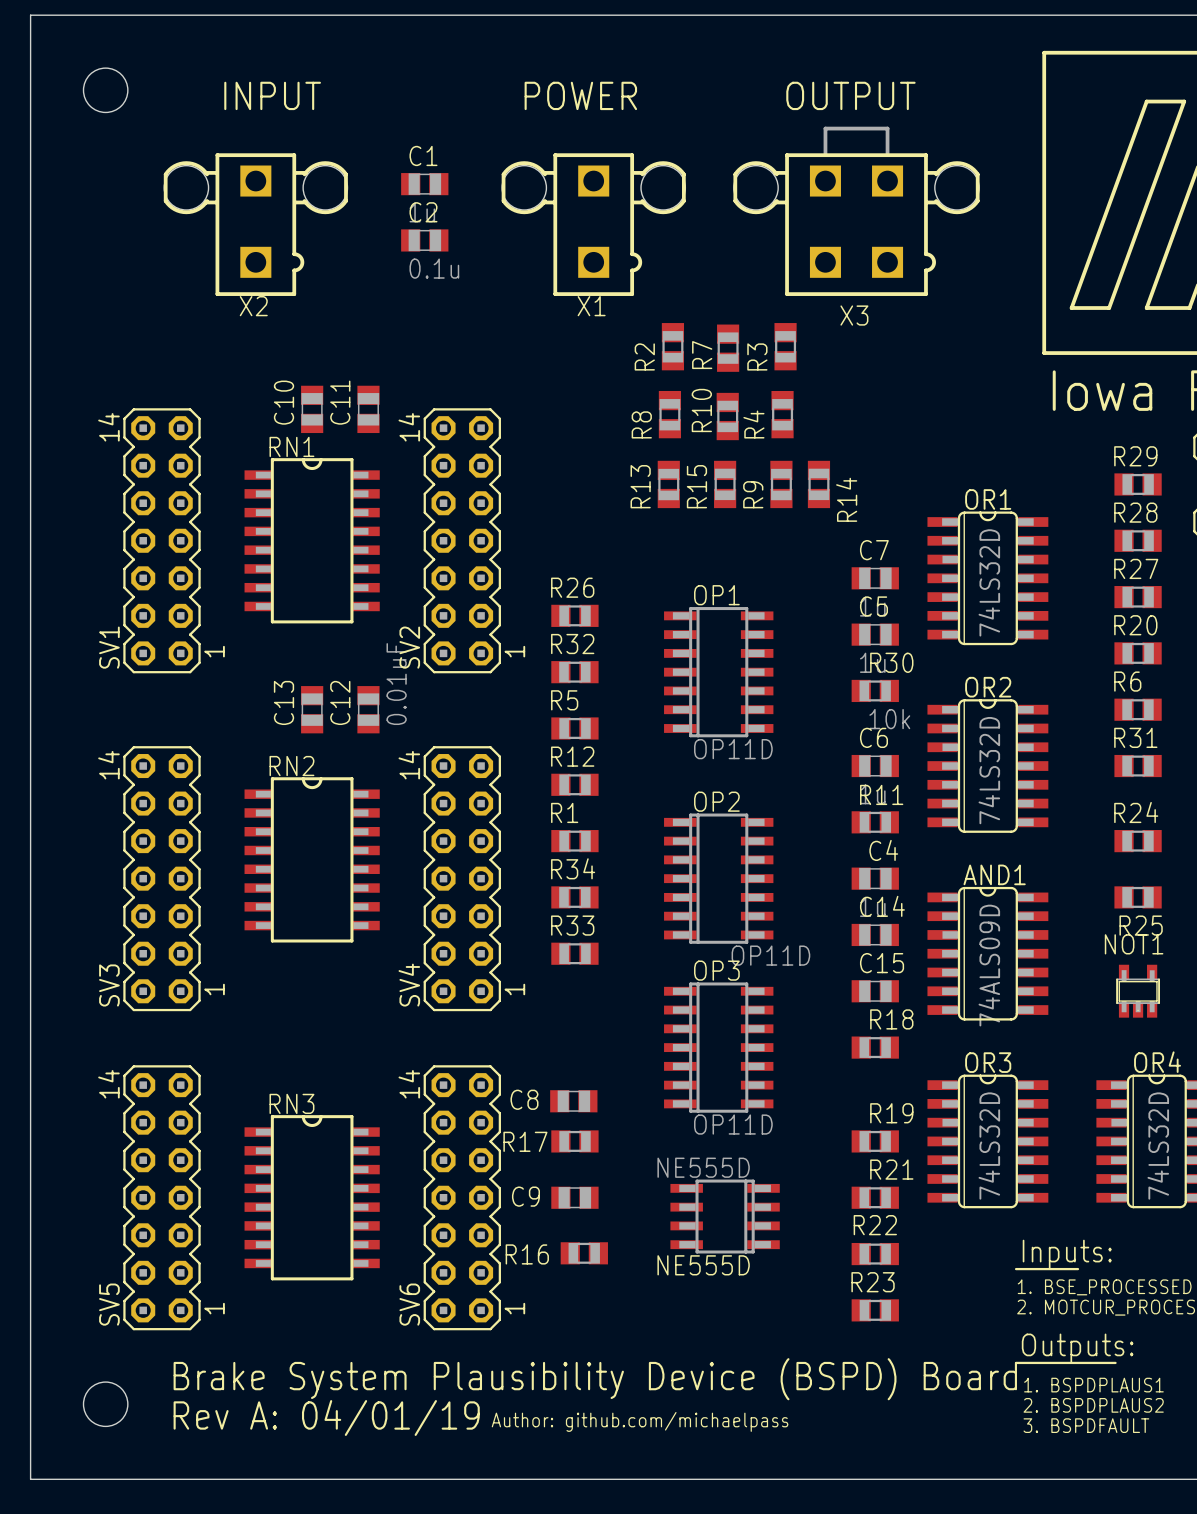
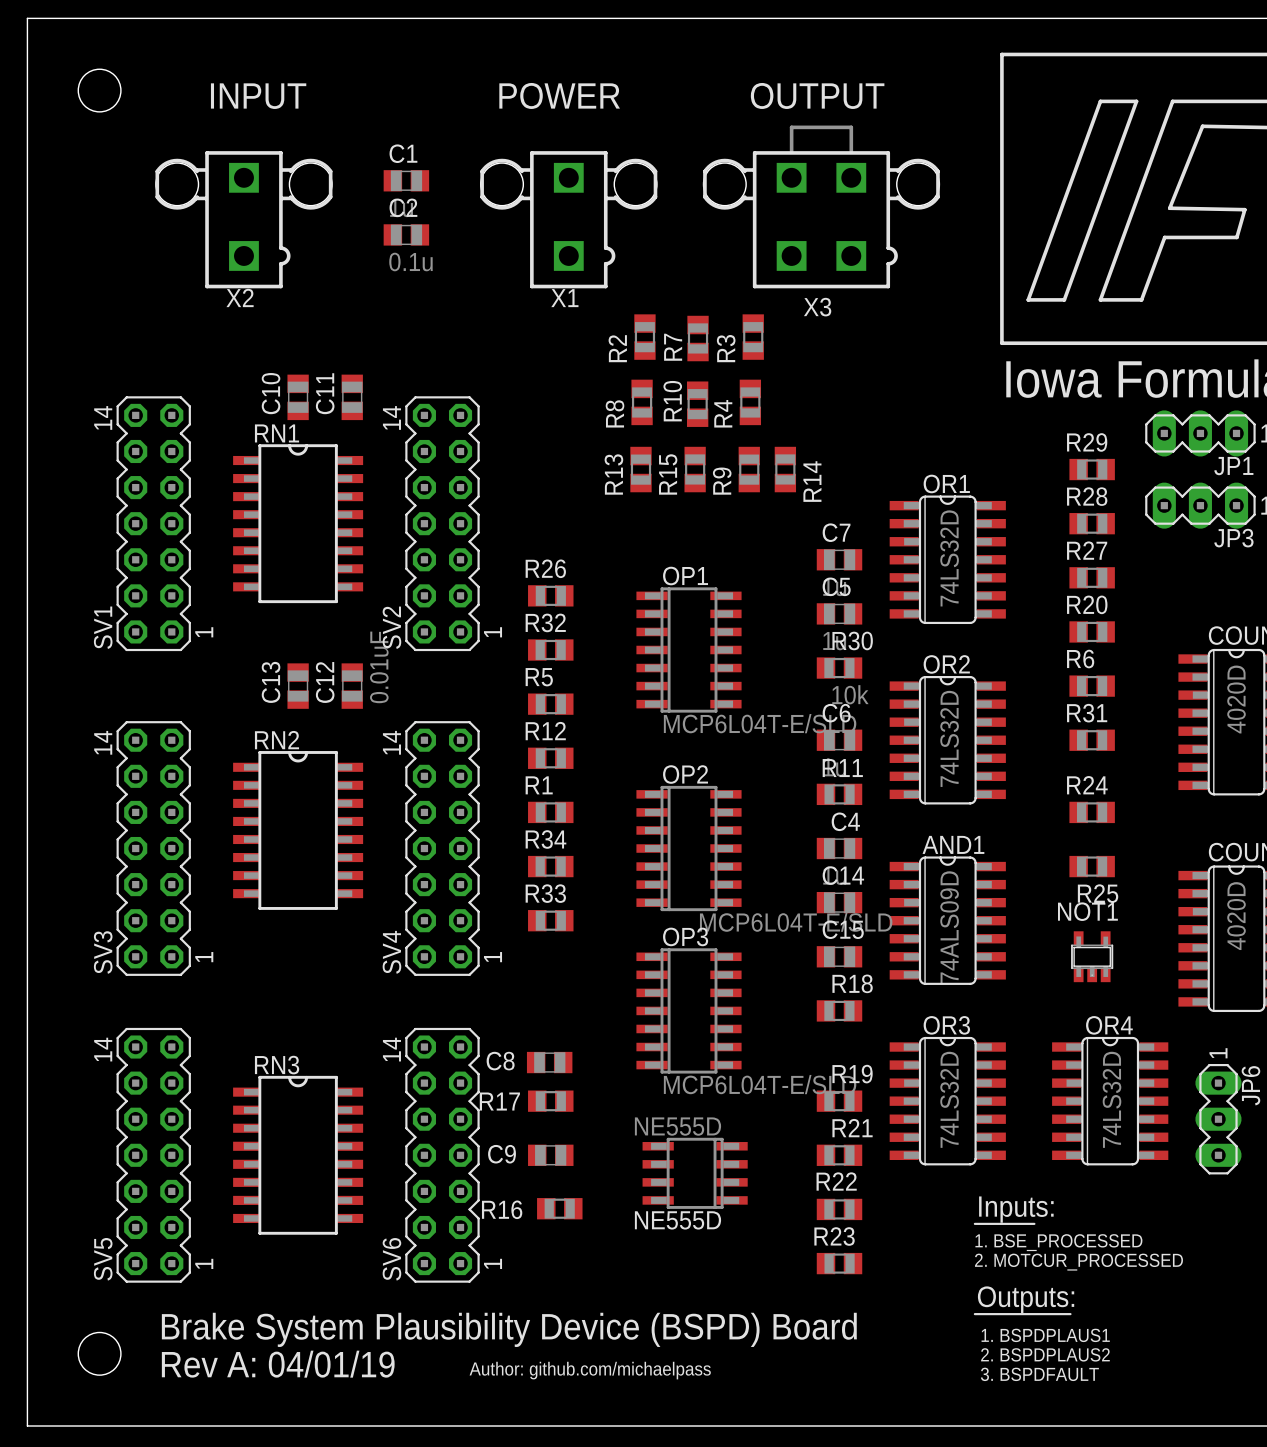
OP1 value: OP11D (733, 749) -> MCP6L04T-E/SLD (760, 723)
OP2 value: OP11D (770, 955) -> MCP6L04T-E/SLD (796, 922)
OP3 value: OP11D (733, 1124) -> MCP6L04T-E/SLD (760, 1084)

